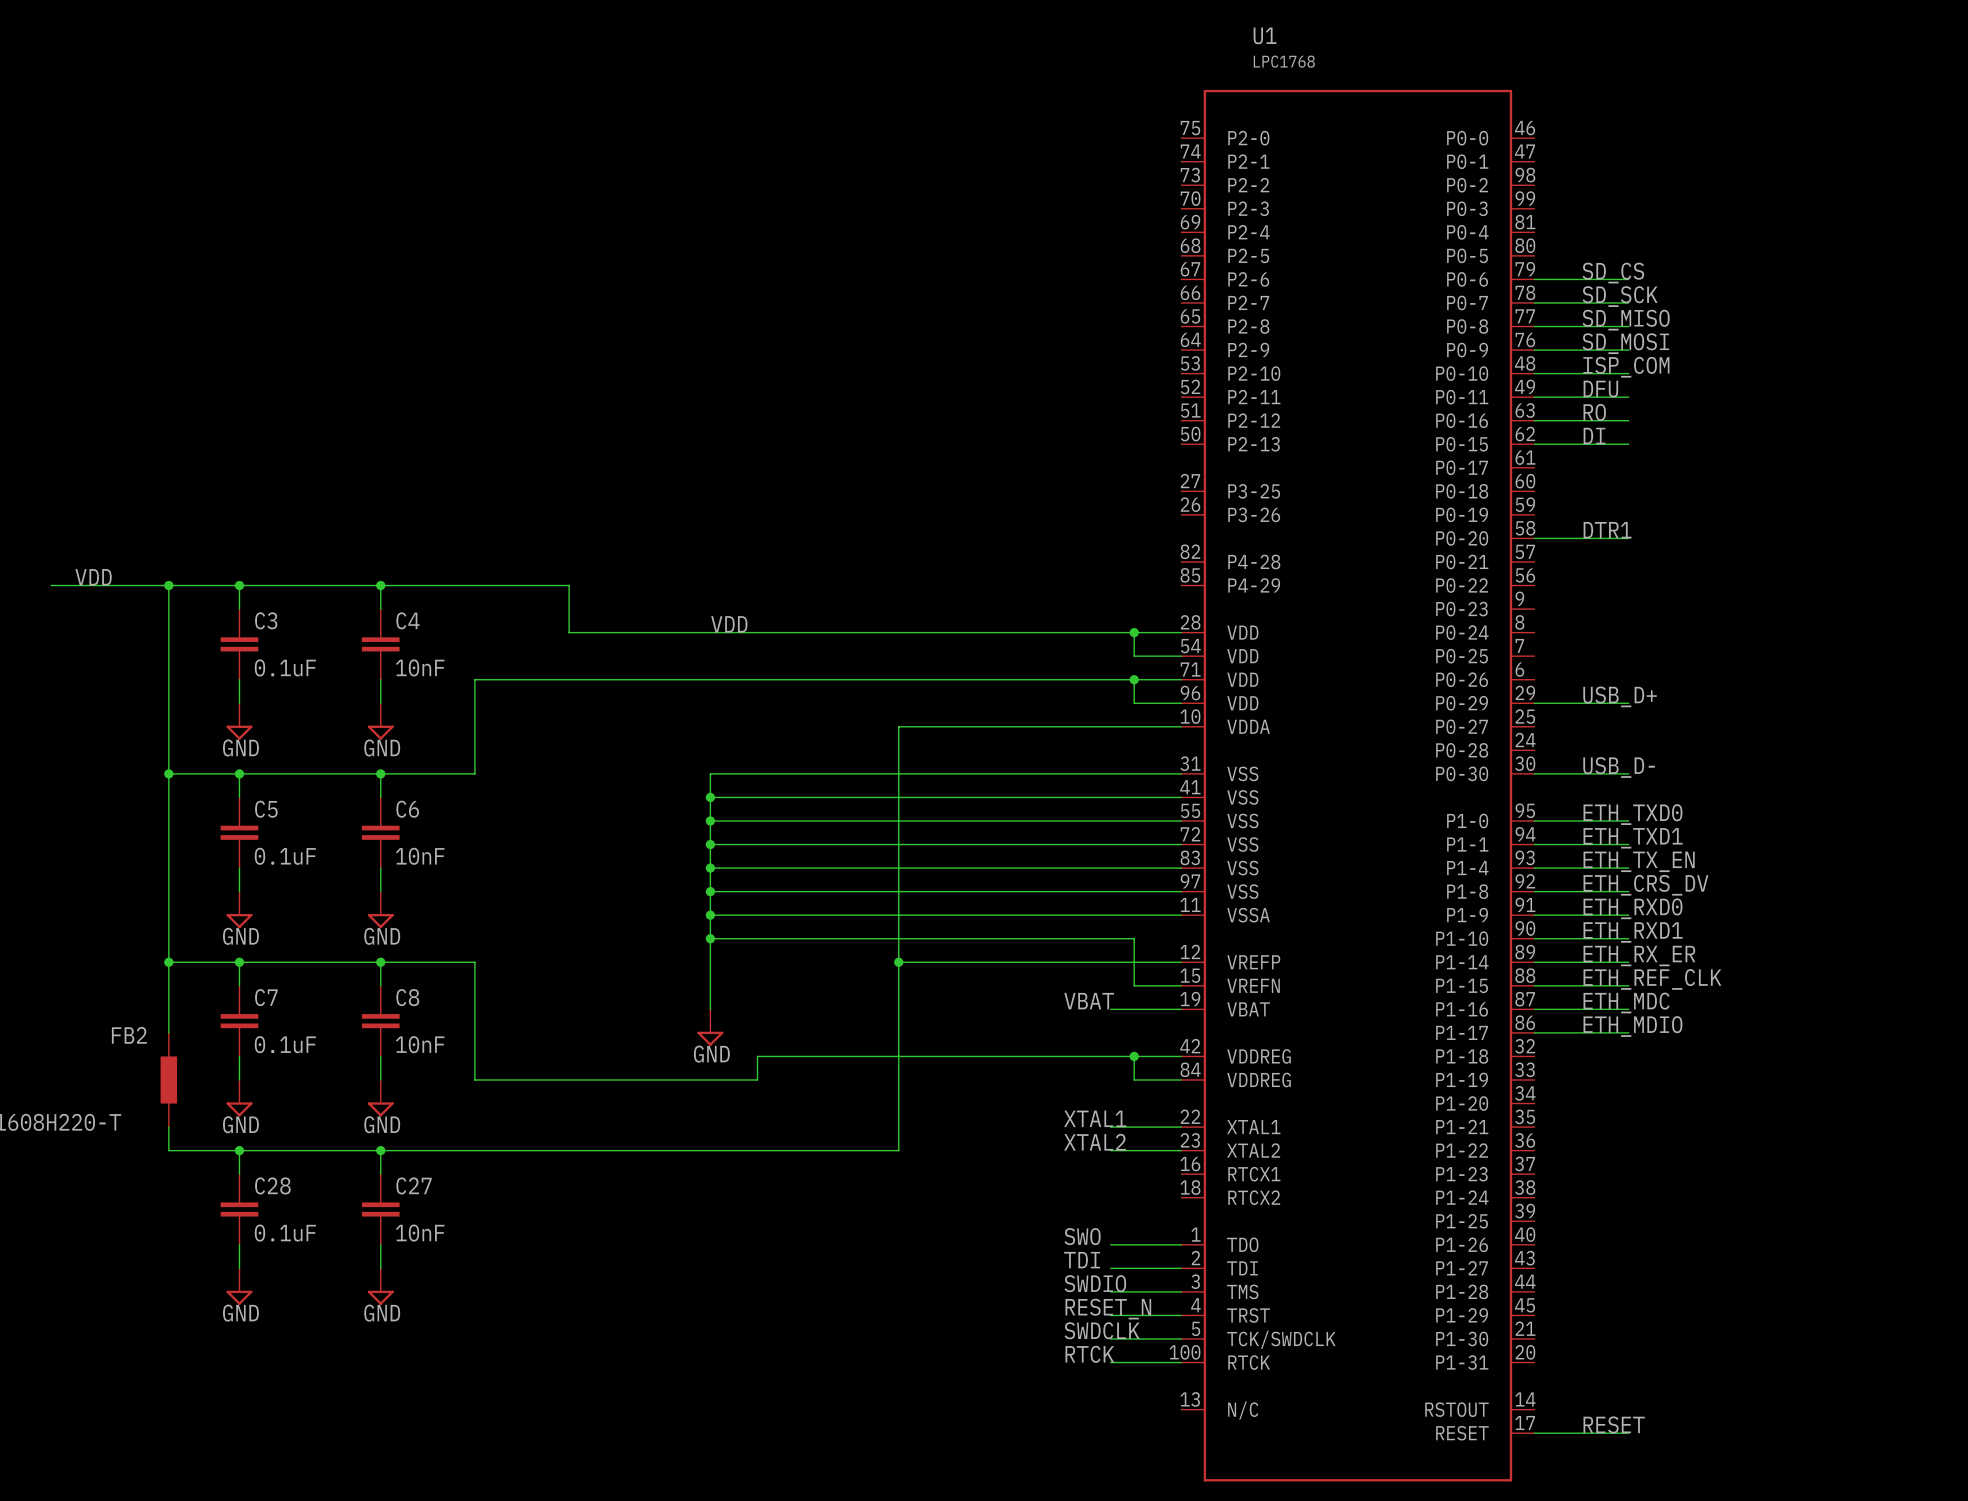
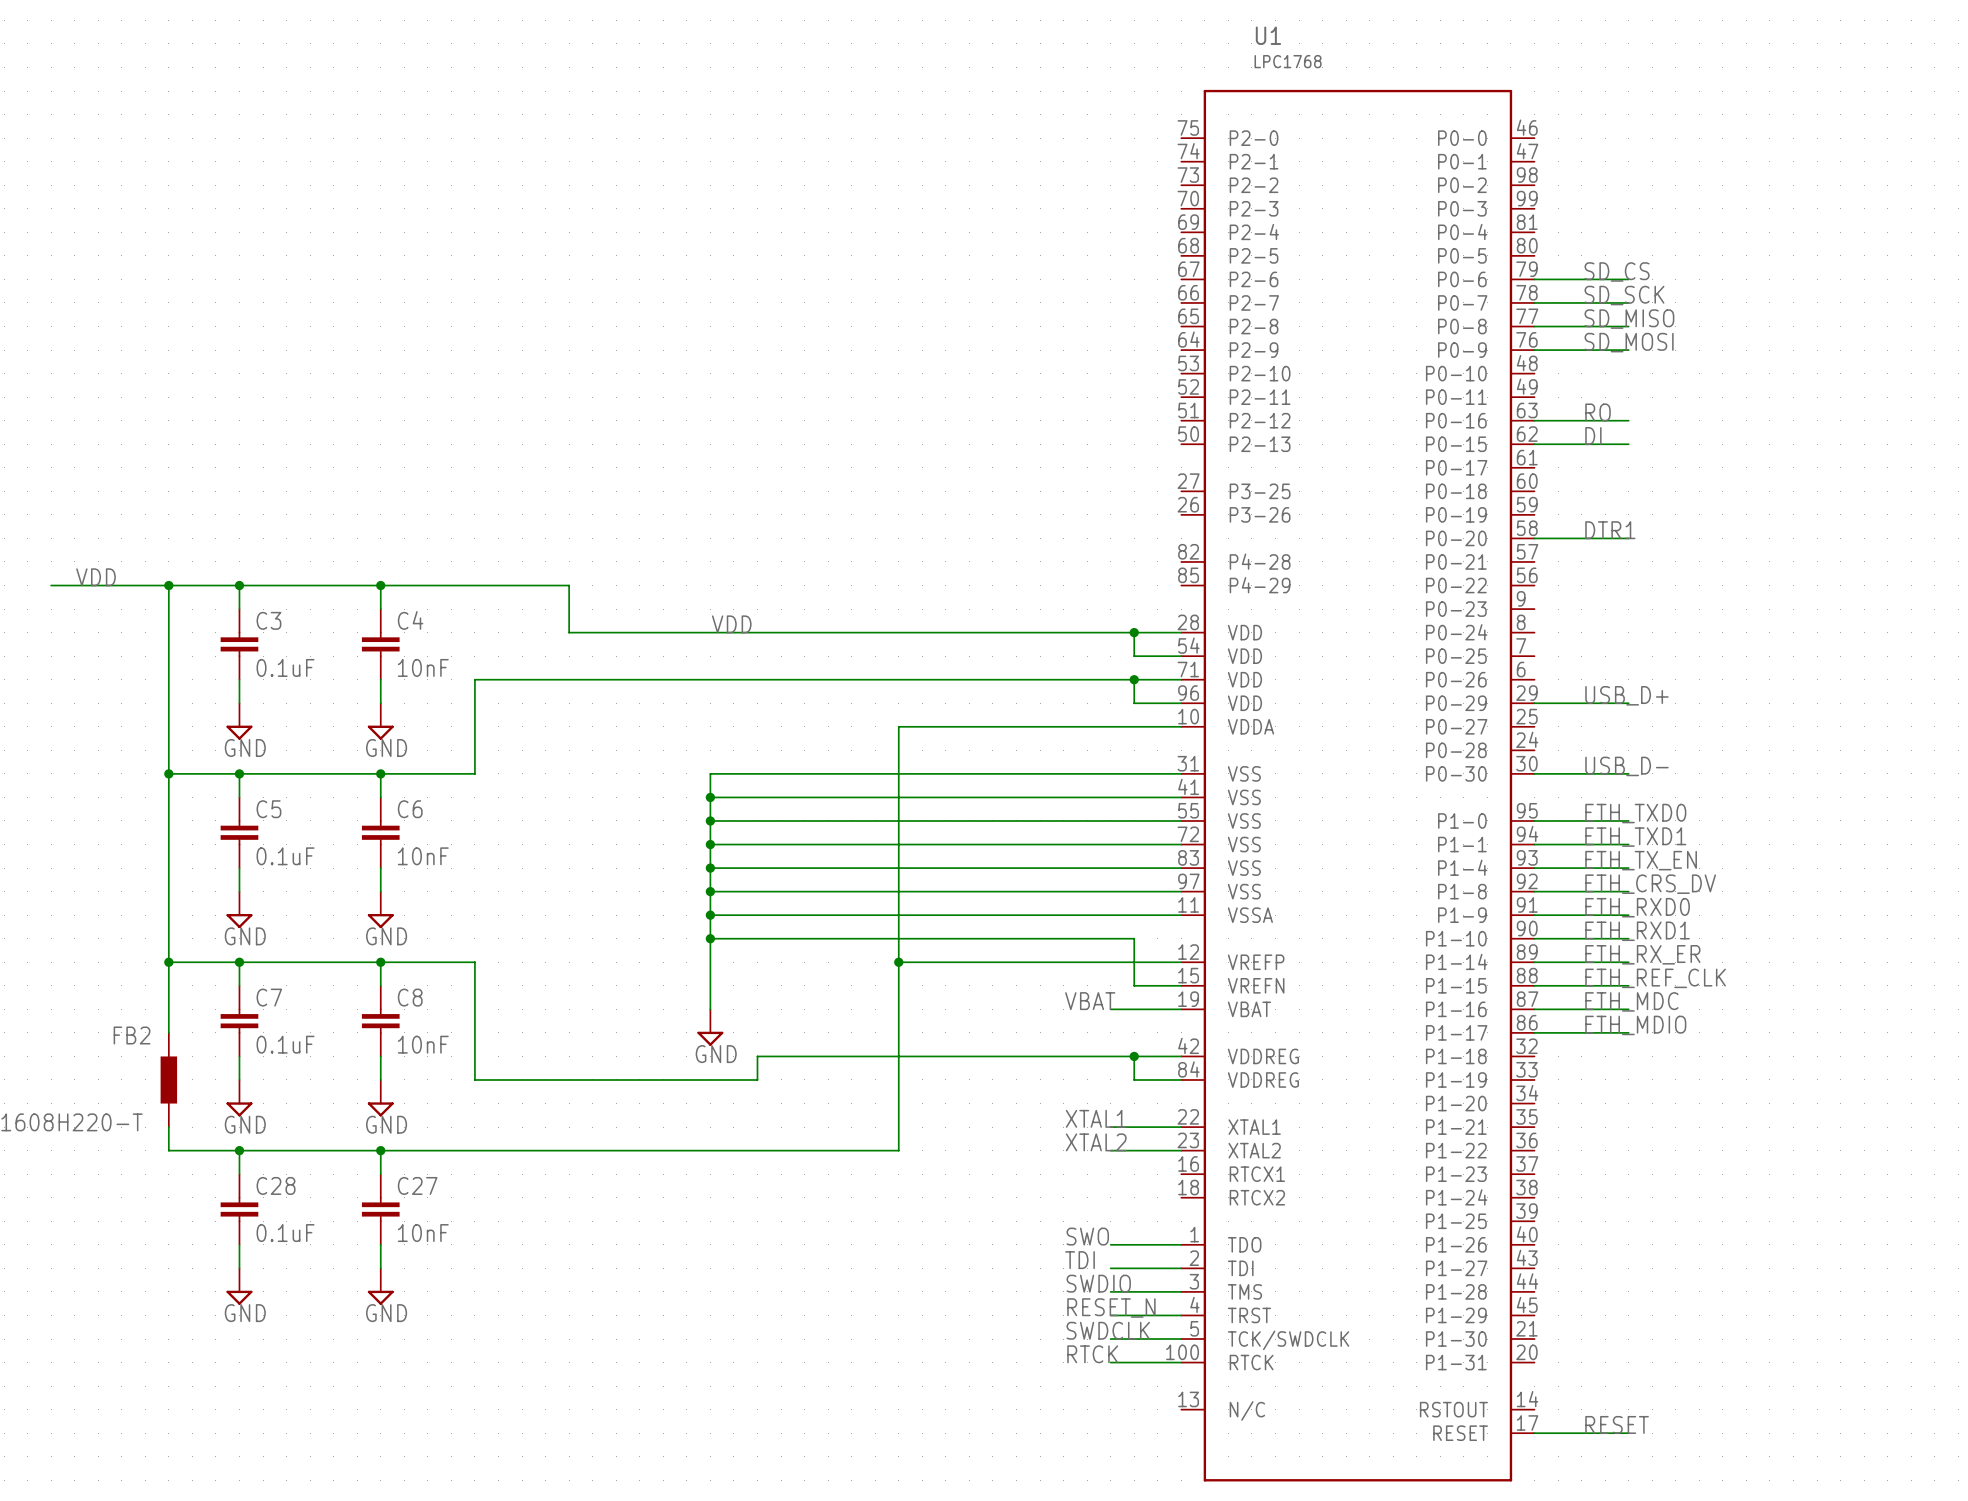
label: ISP_COM (1626, 367) -> none
wire: (1534, 373) (1628, 373) -> none
label: DFU (1600, 389) -> none
wire: (1534, 397) (1628, 397) -> none

